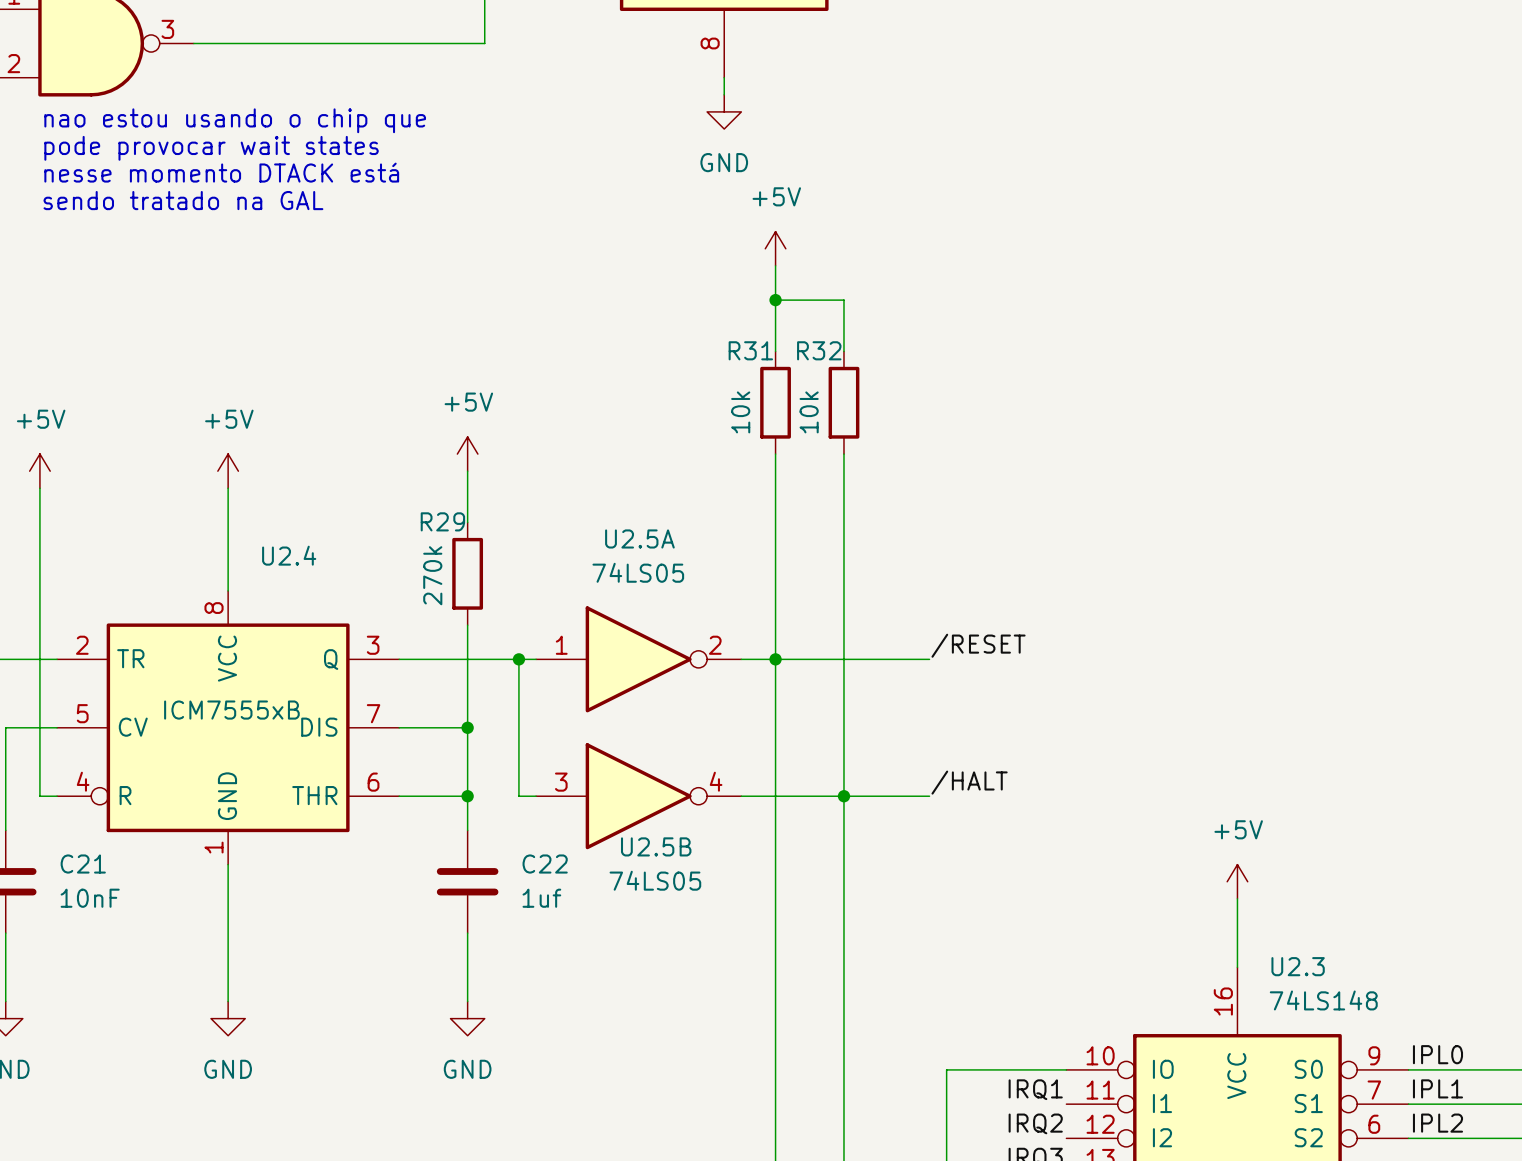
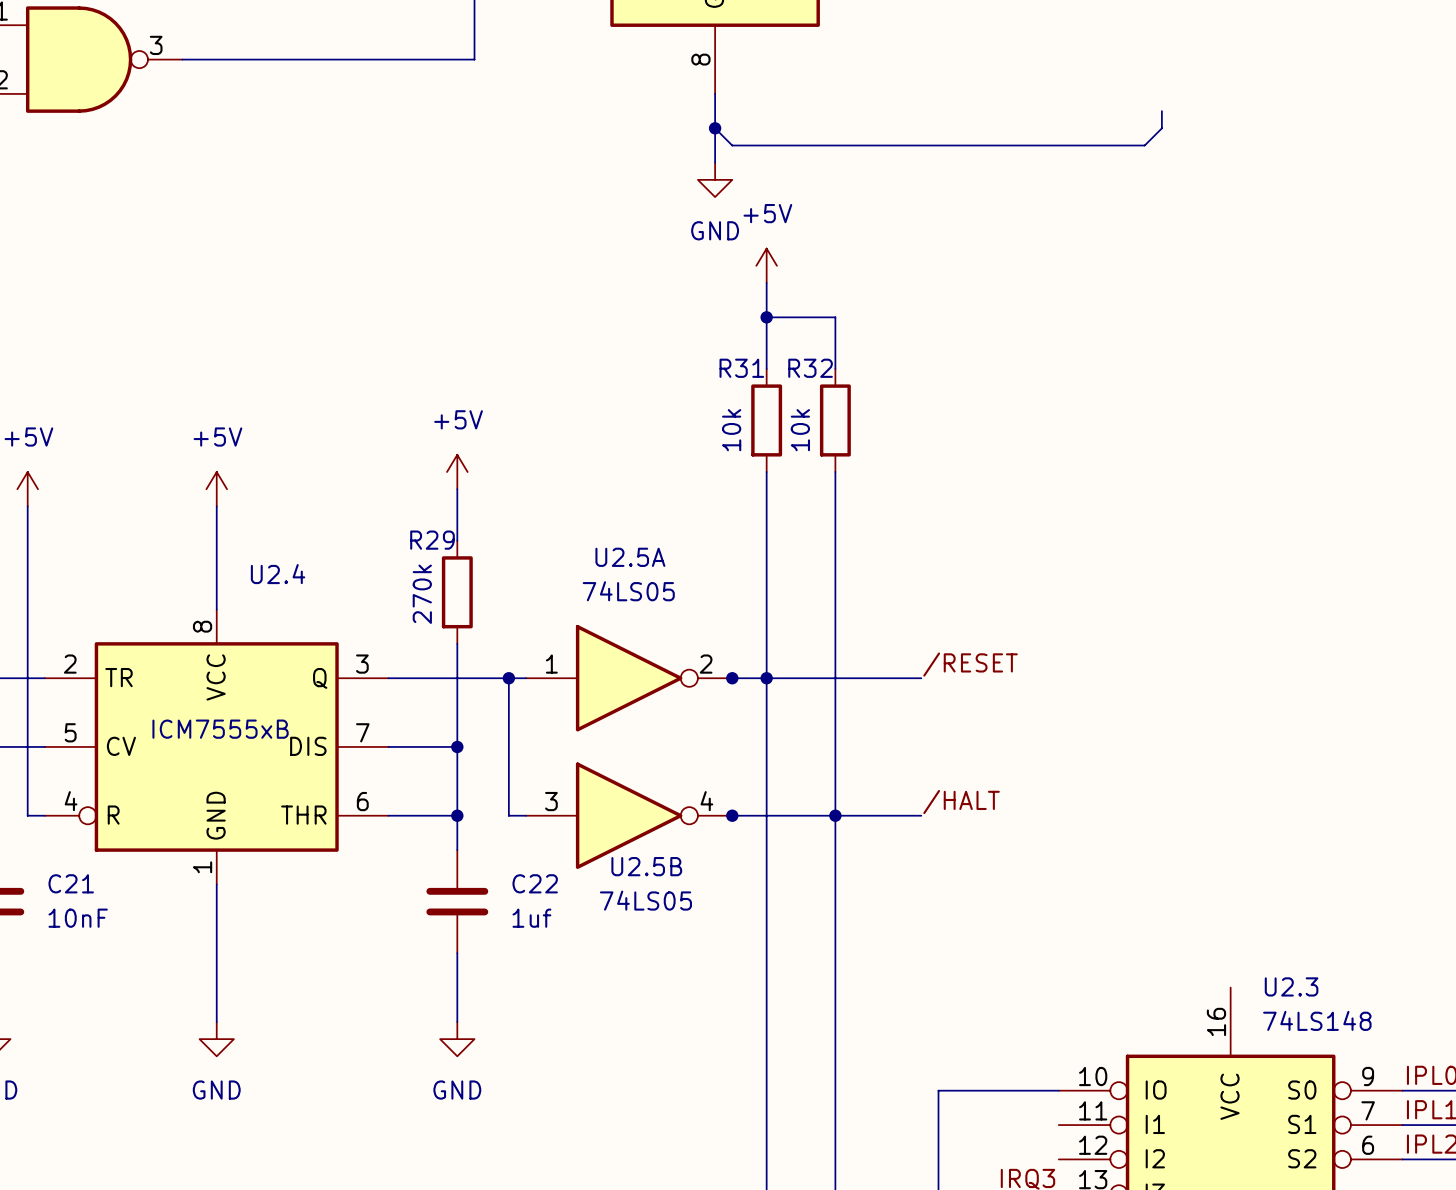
wire: none -> (715, 111) (715, 162)
wire: none -> (1161, 111) (1161, 128) (1144, 145) (732, 145) (715, 128)
junction: none -> (715, 128)
power symbol position: GND (724, 111) -> GND (715, 179)
text: nao estou usando o chip que (235, 120) -> none
text: pode provocar wait states (211, 148) -> none
text: nesse momento DTACK está (221, 172) -> none
text: sendo tratado na GAL (183, 200) -> none
junction: none -> (732, 678)
junction: none -> (732, 815)
power symbol: +5V (1237, 881) -> none
wire: (1237, 898) (1237, 967) -> none
label: IRQ1 (1035, 1089) -> none
label: IRQ2 (1035, 1123) -> none

